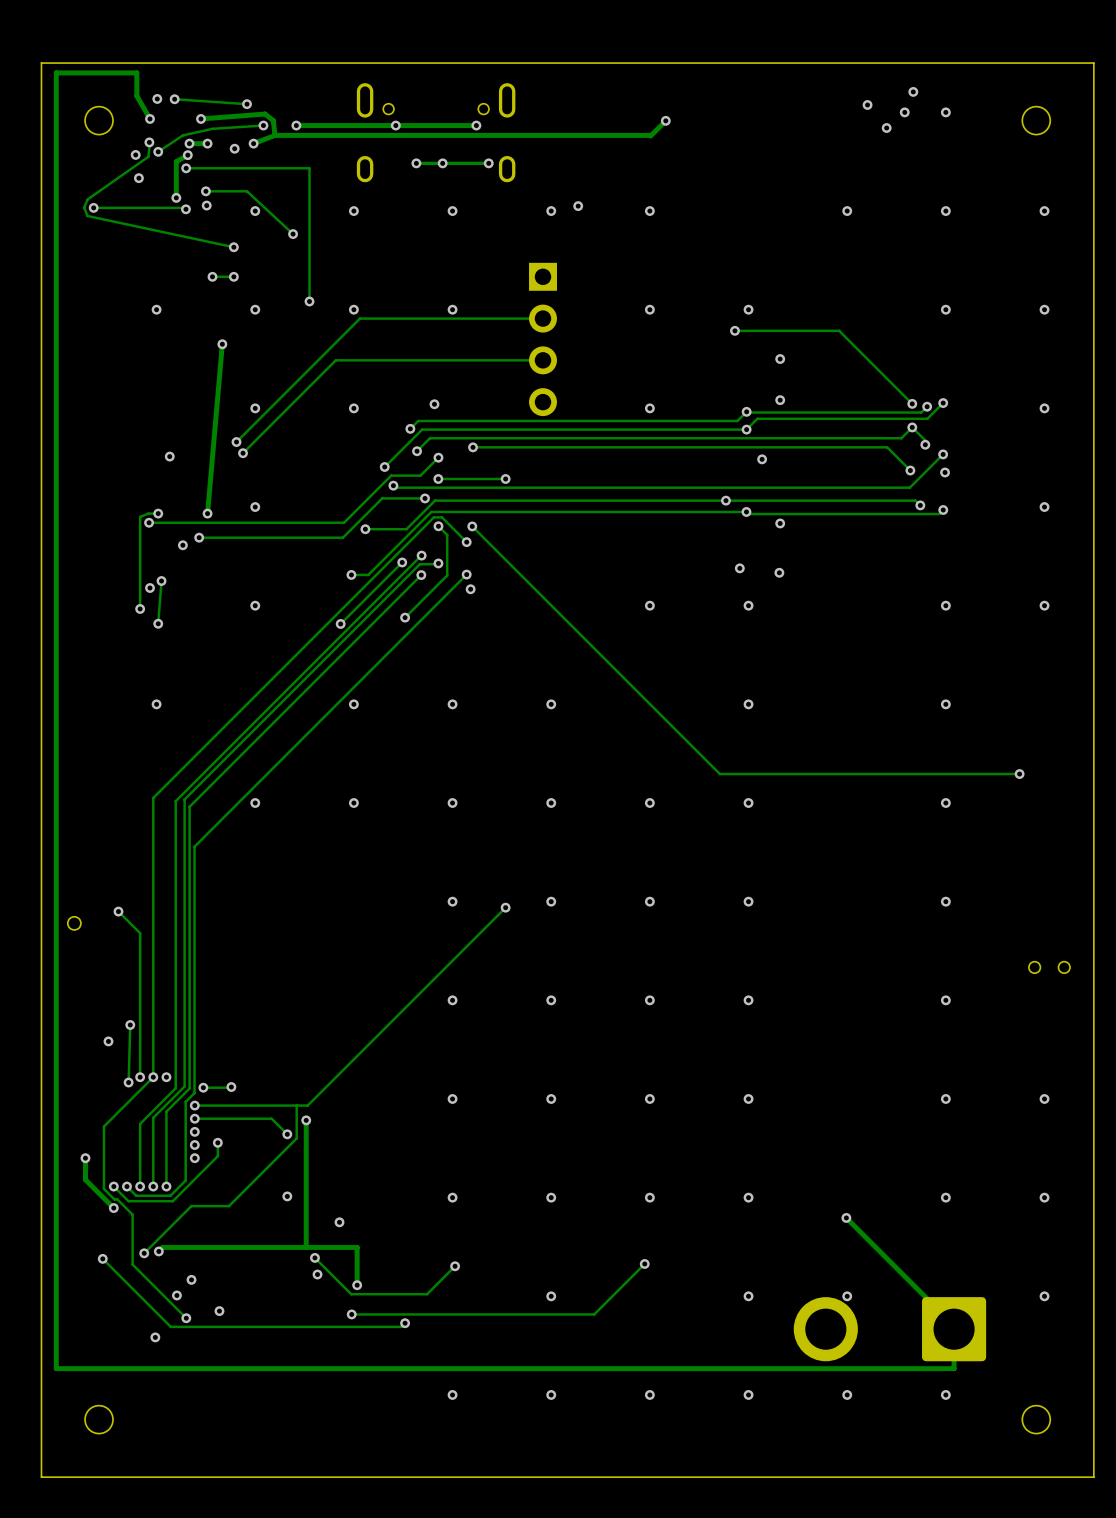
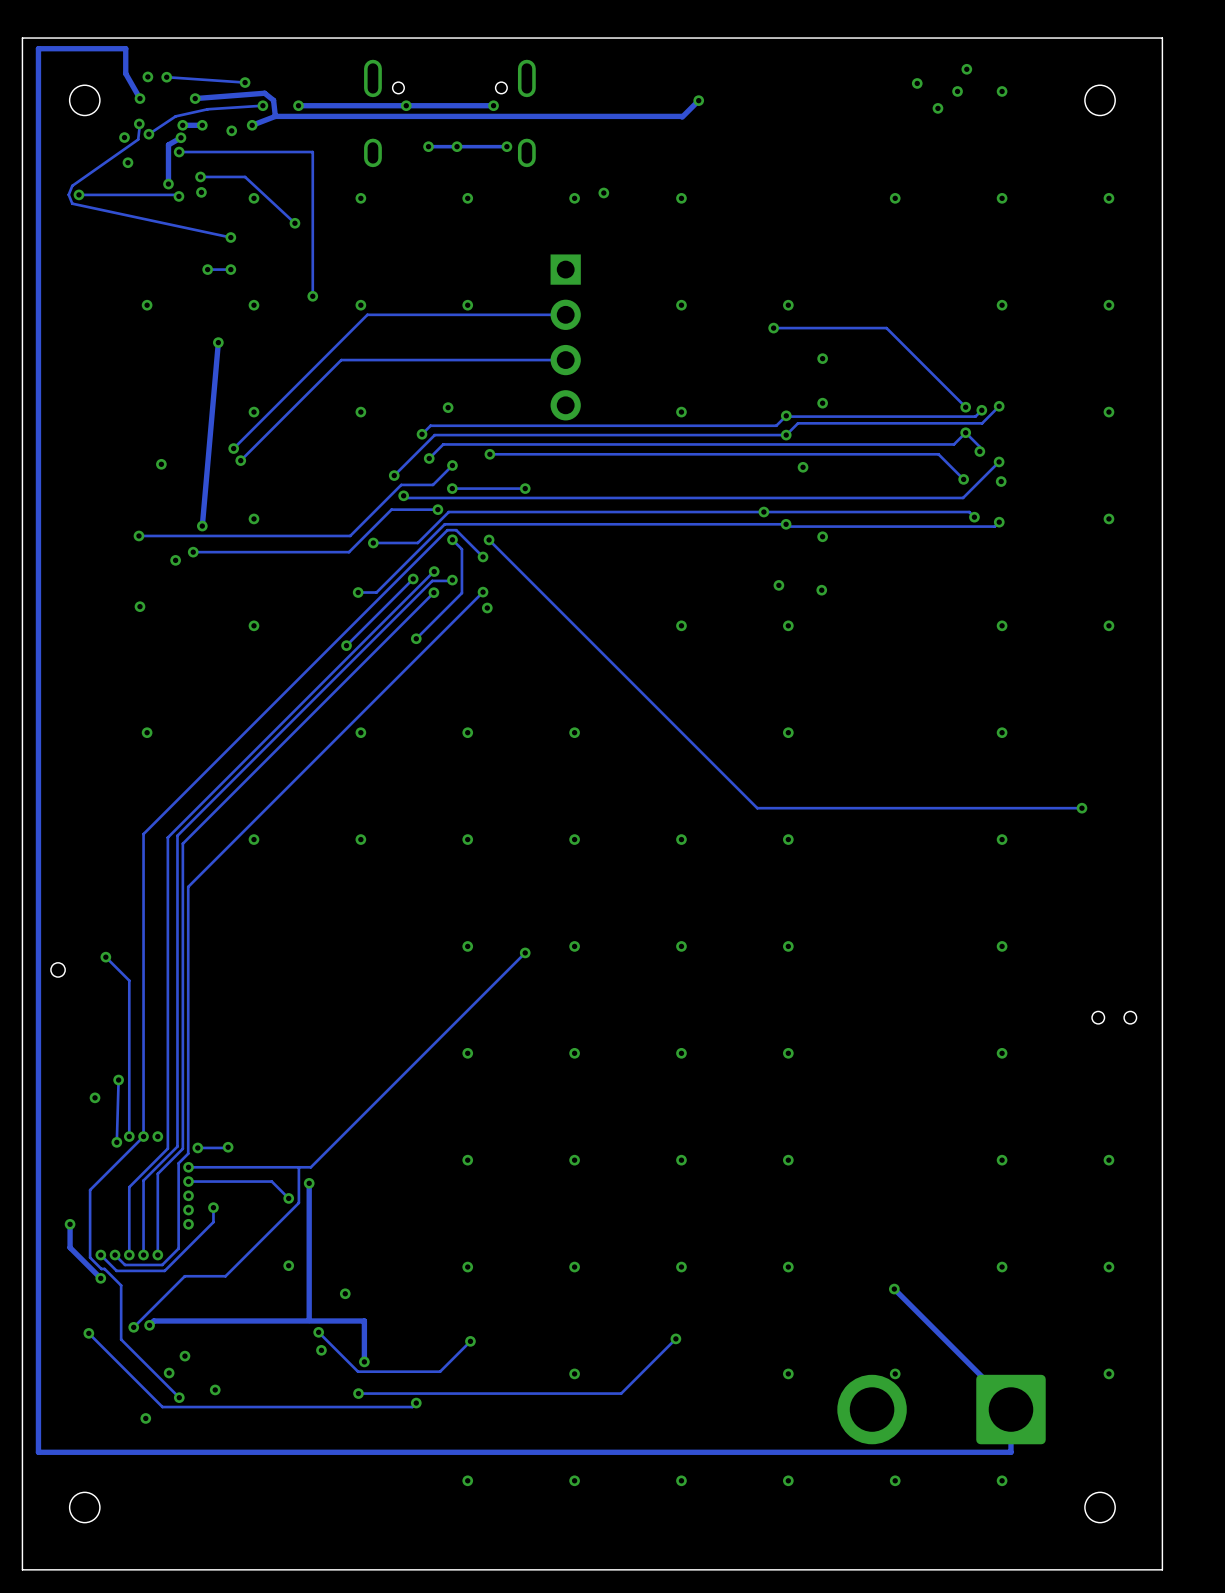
track: (158, 513) (148, 513) (140, 516) (140, 608) -> none
via: (158, 513) -> none
track: (161, 581) (158, 623) -> none
via: (161, 581) -> none
via: (140, 608) -> none
via: (158, 623) -> none

